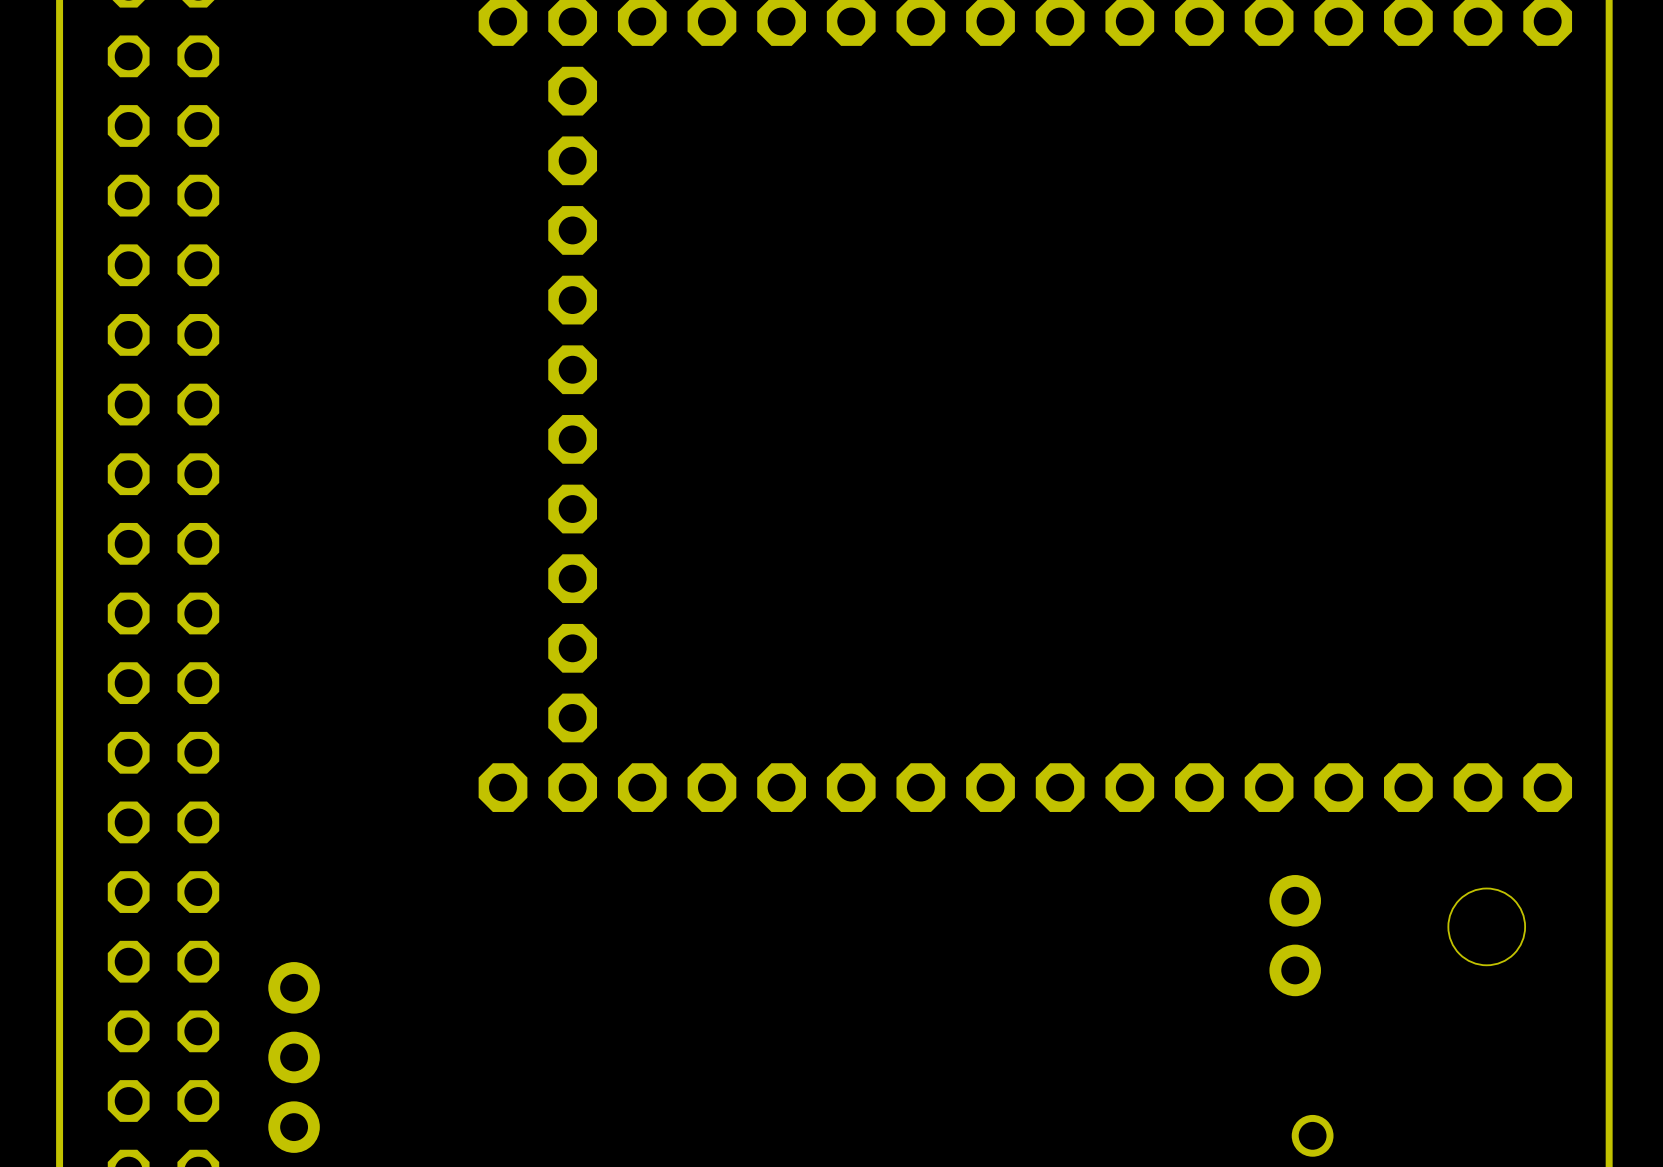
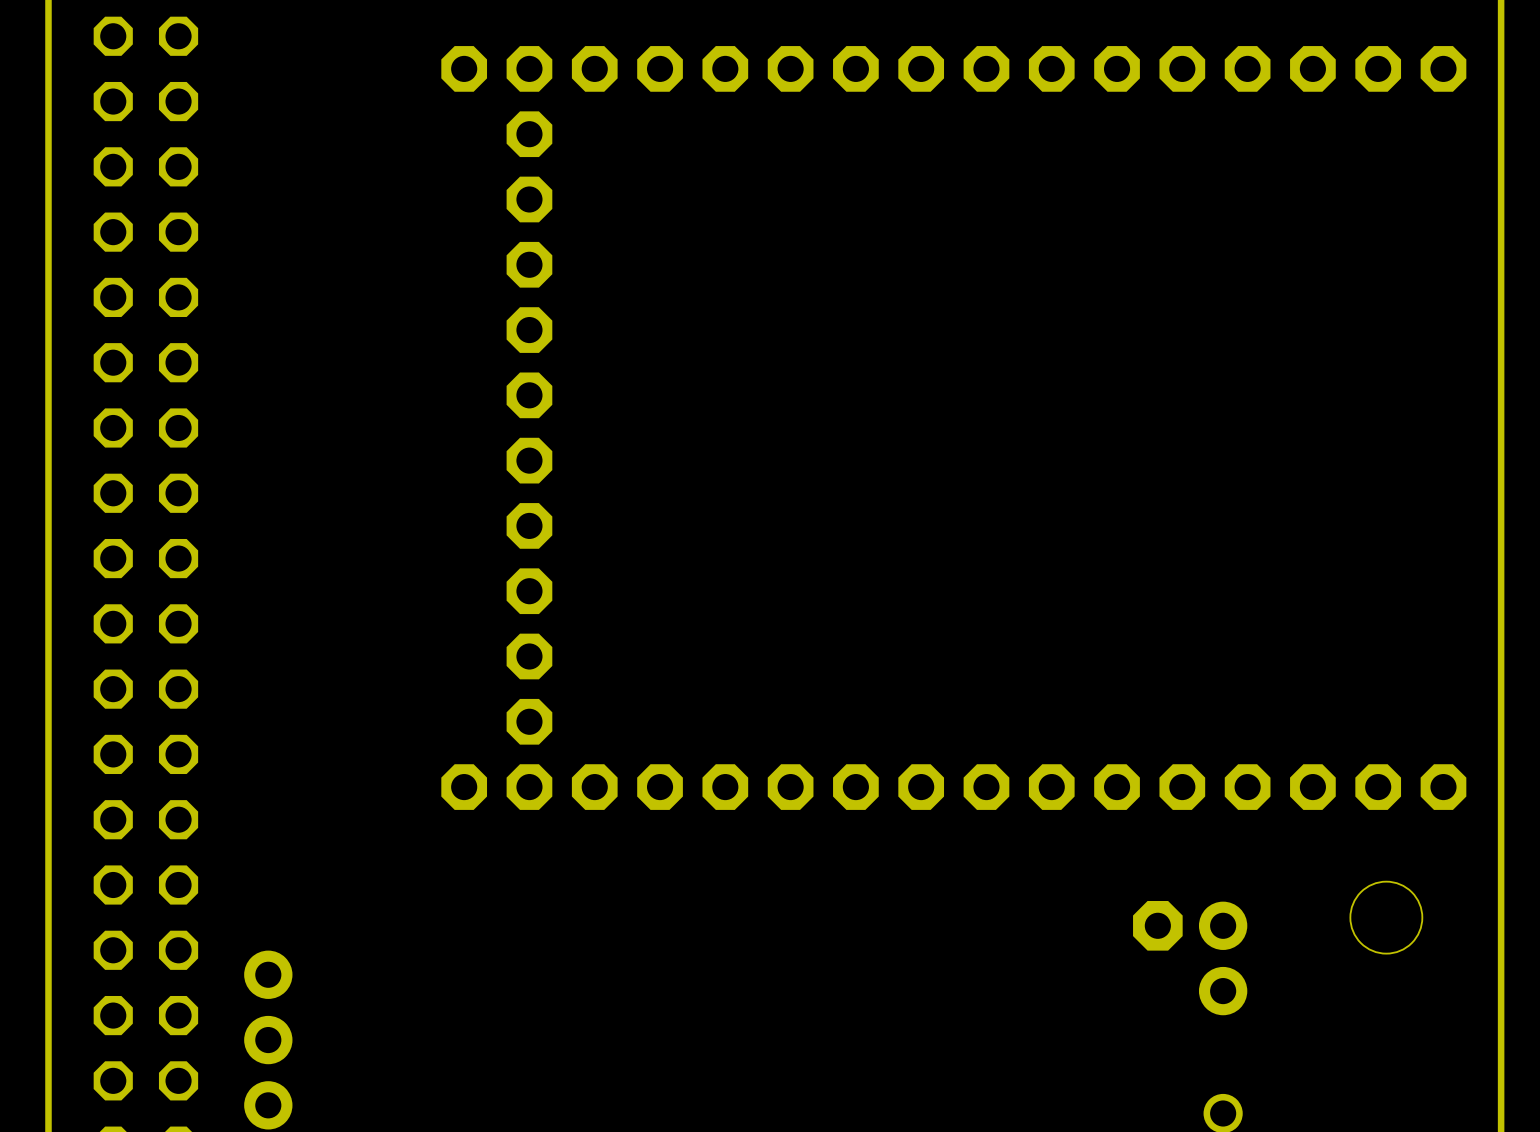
part: none -> (1157, 925)
part position: (1295, 935) -> (1223, 958)

